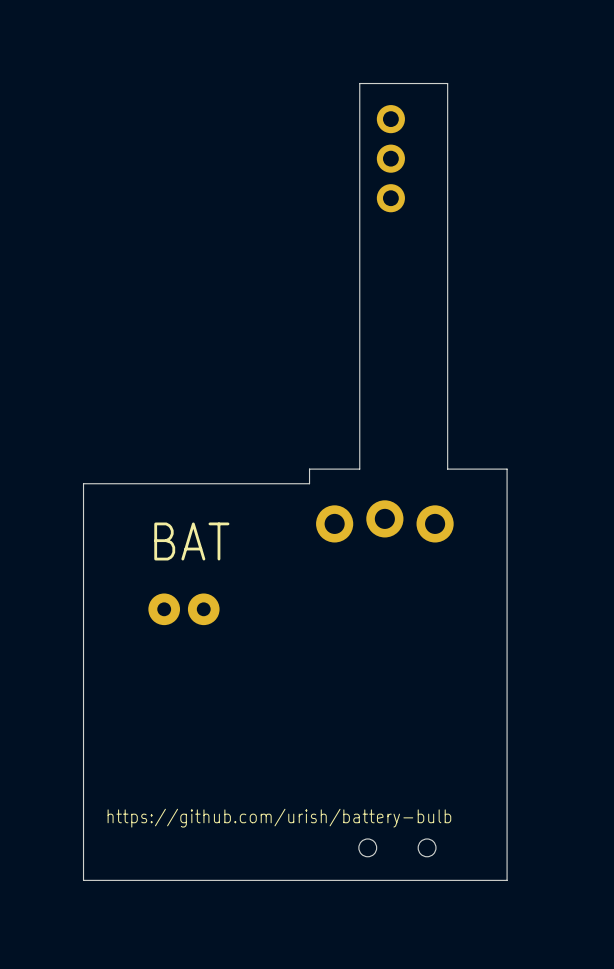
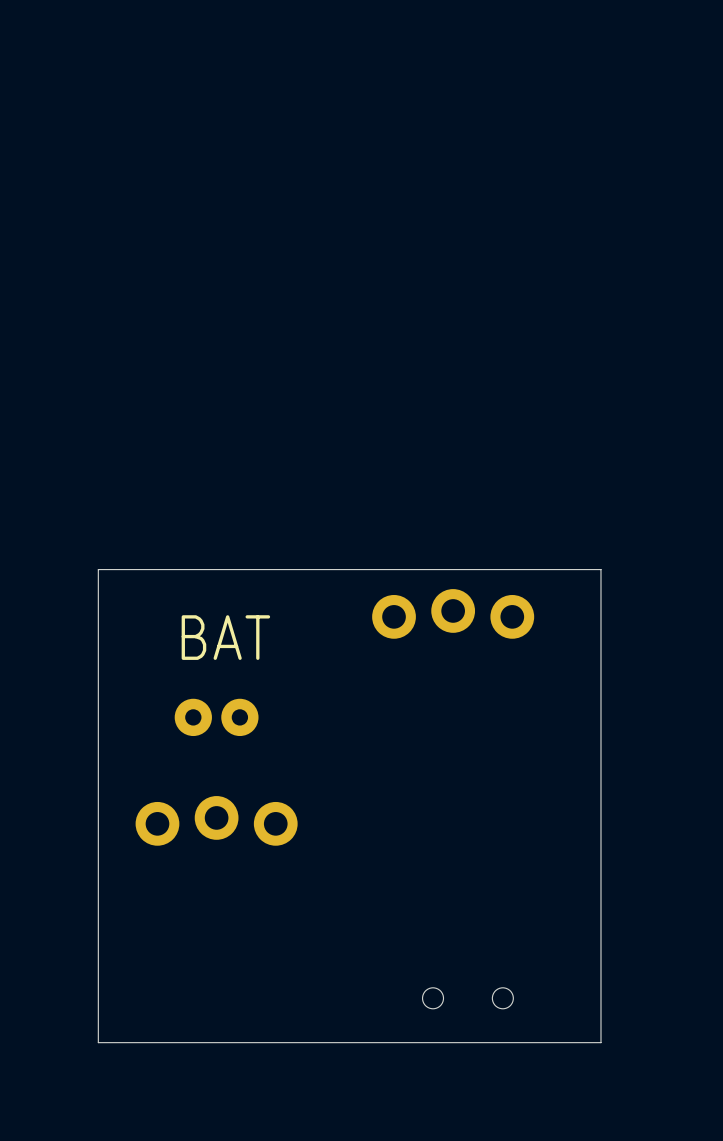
part: (390, 158) -> none
board edge: (309, 483) (309, 469) (359, 469) (359, 83) (447, 83) (447, 469) (507, 469) (507, 880) (83, 880) -> (364, 569) (600, 569) (600, 1042) (98, 1042) (98, 1036)
part: none -> (216, 820)
text: https://github.com/urish/battery-bulb (279, 818) -> none

